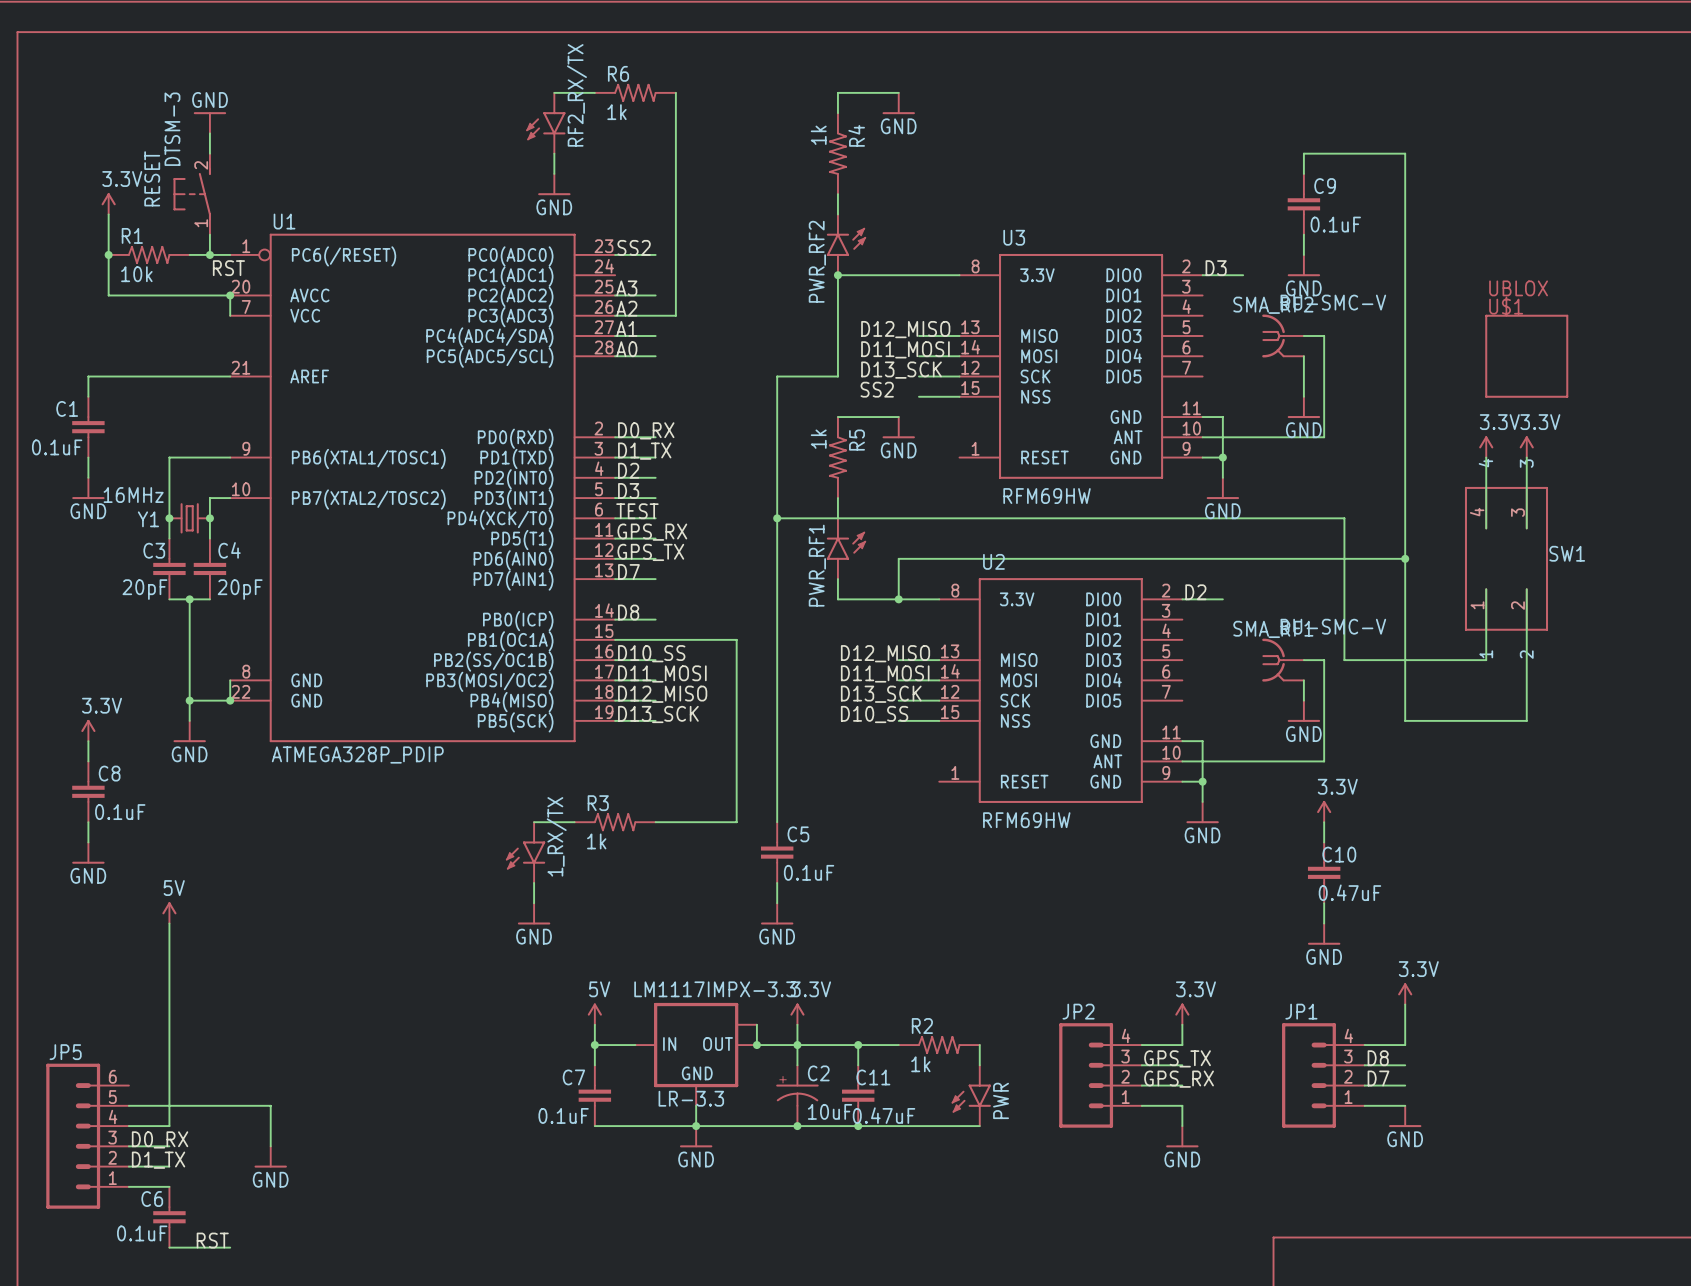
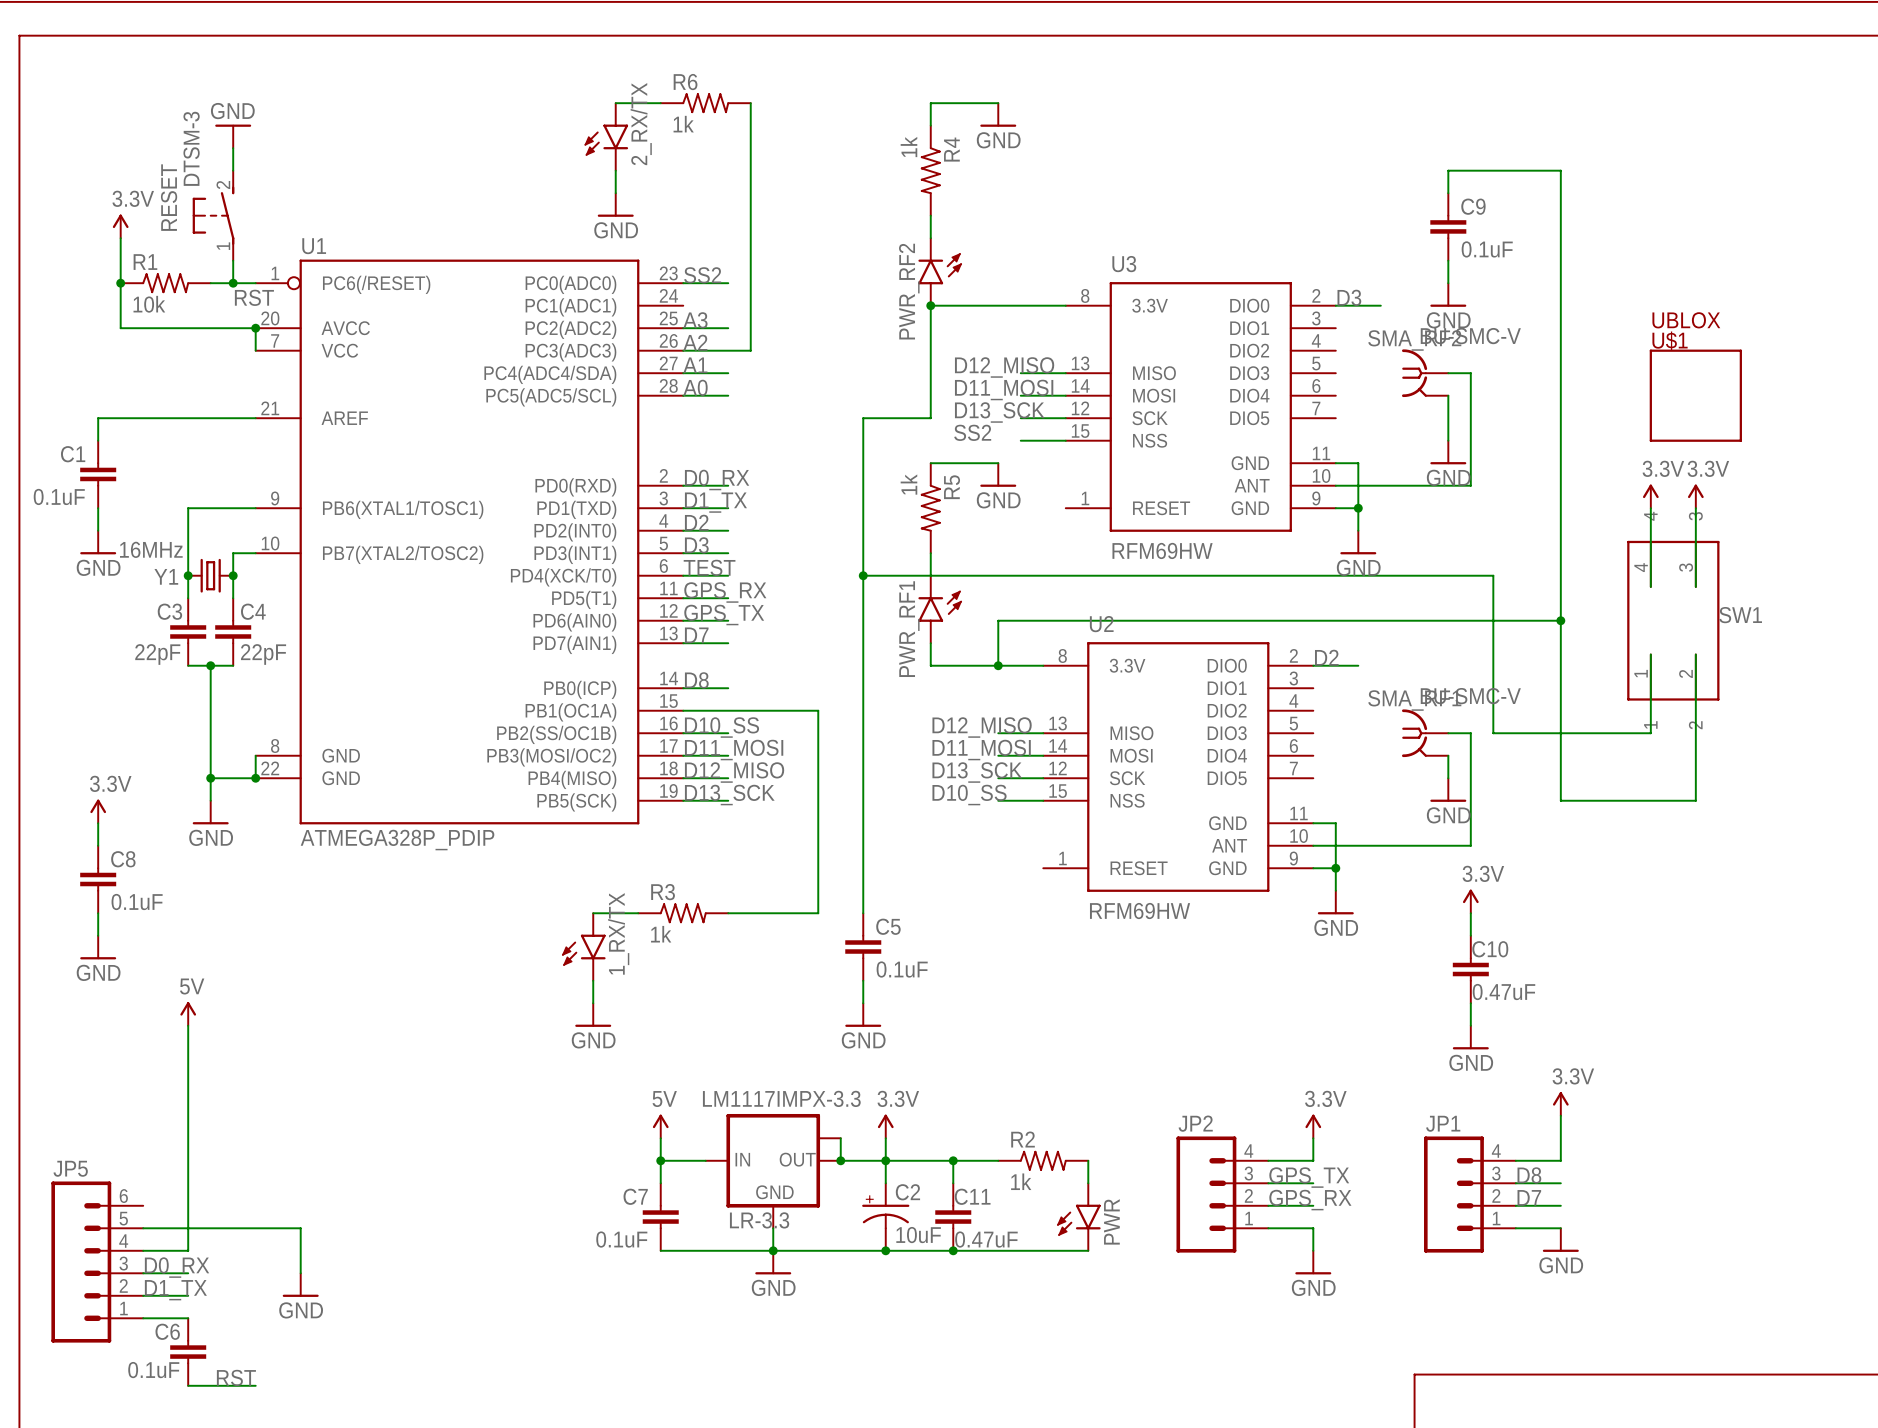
RF2_RX/TX name: RF2_RX/TX (576, 95) -> 2_RX/TX (641, 124)
C3 value: 20pF (144, 589) -> 22pF (157, 654)
C4 value: 20pF (240, 589) -> 22pF (263, 654)

